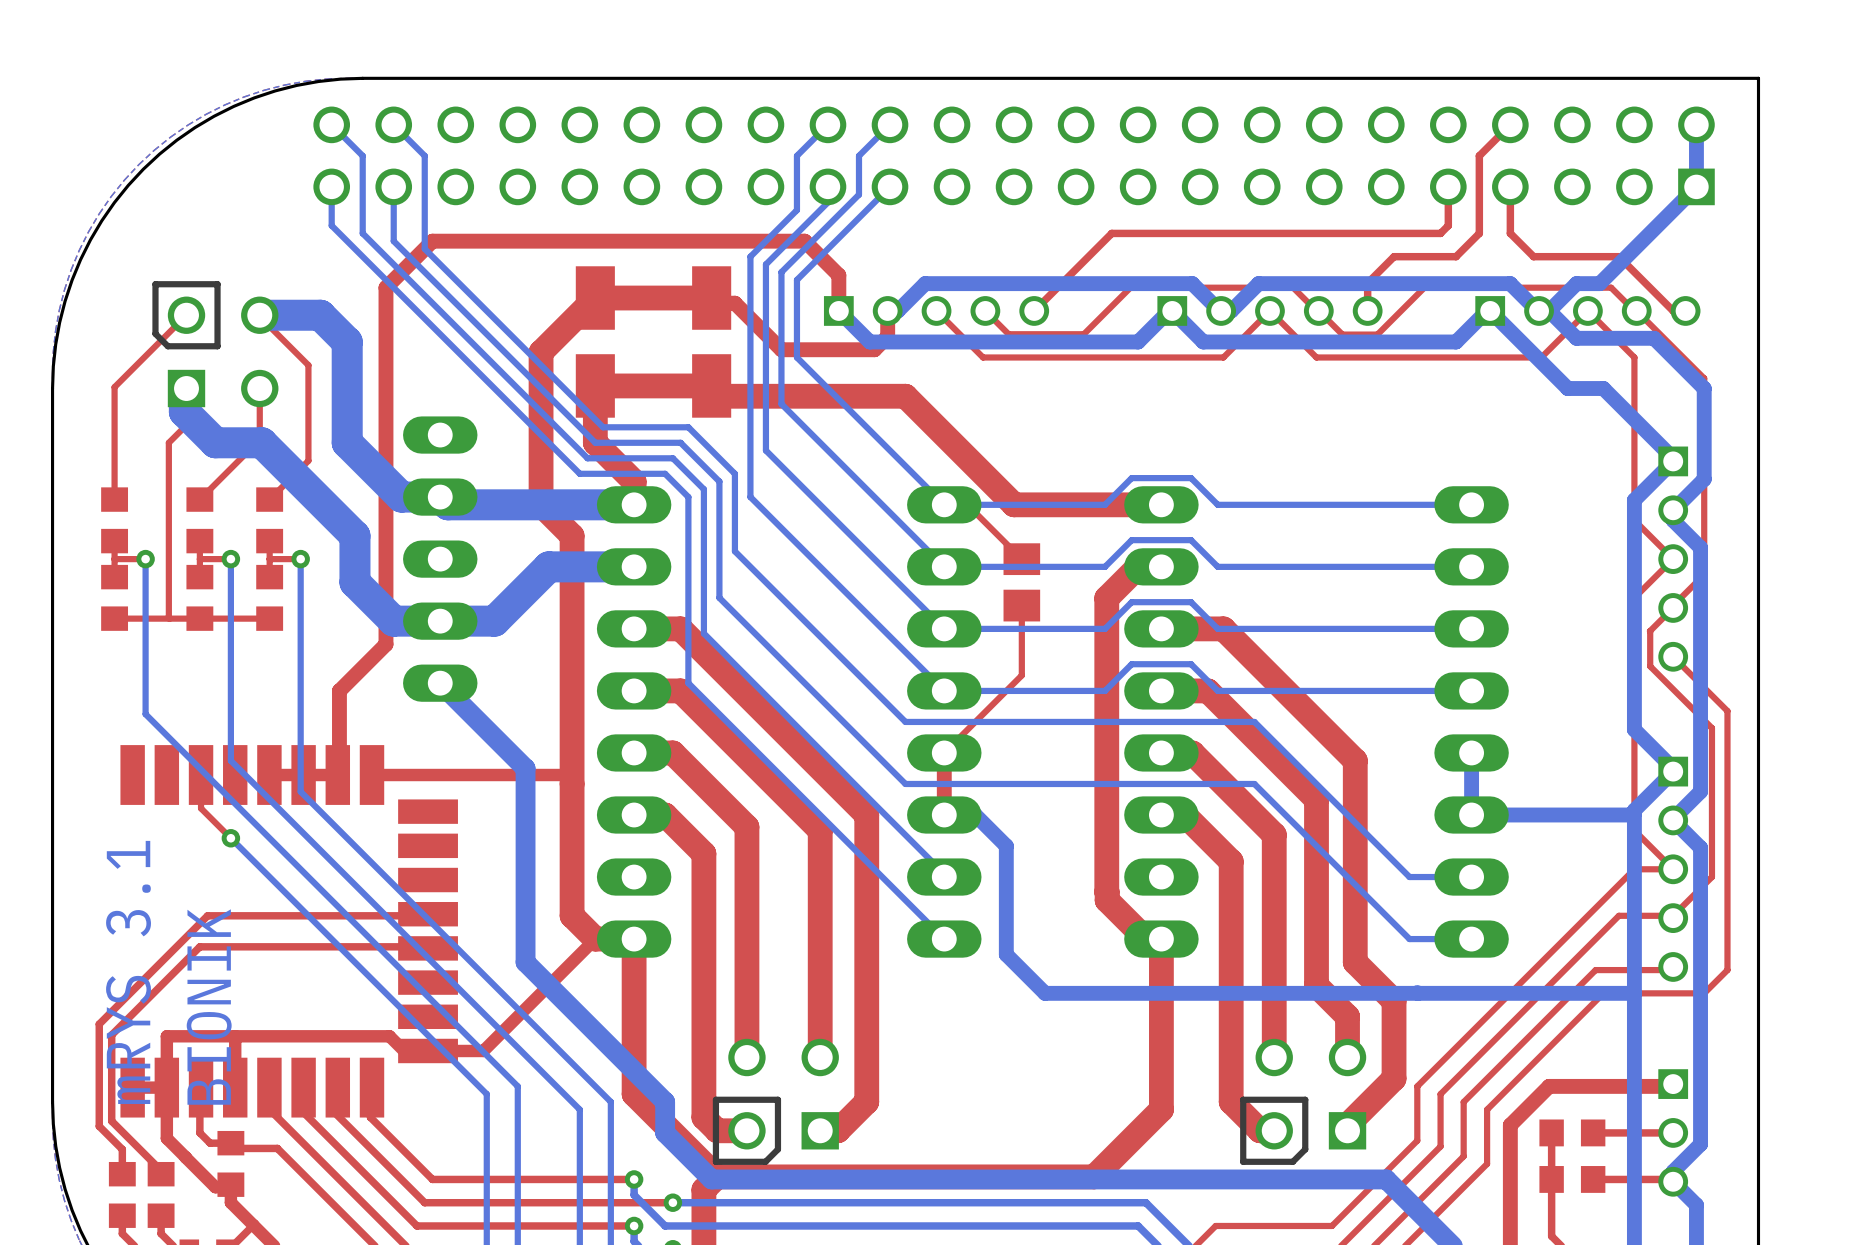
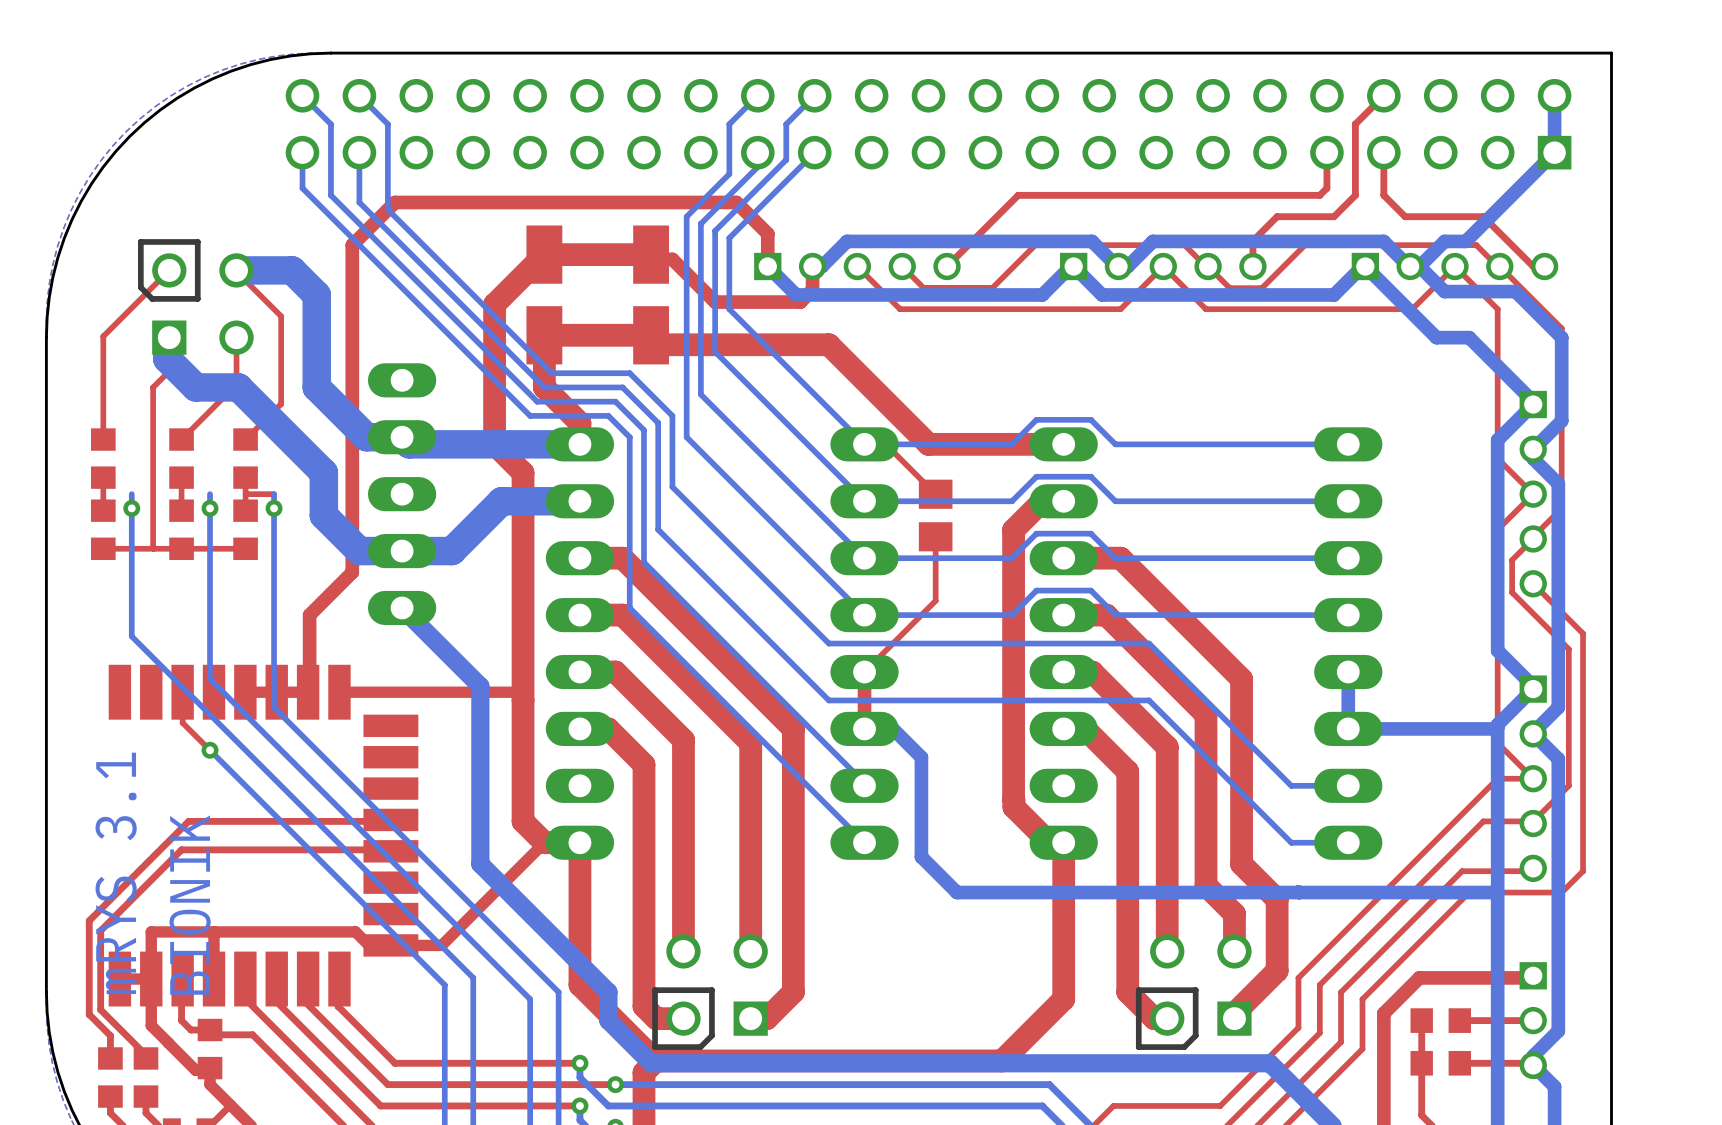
top track: (145, 559) (114, 559) -> none
via position: (145, 559) -> (131, 508)
top track: (230, 559) (199, 559) -> none
via position: (230, 559) -> (210, 508)
via position: (300, 559) -> (274, 508)

